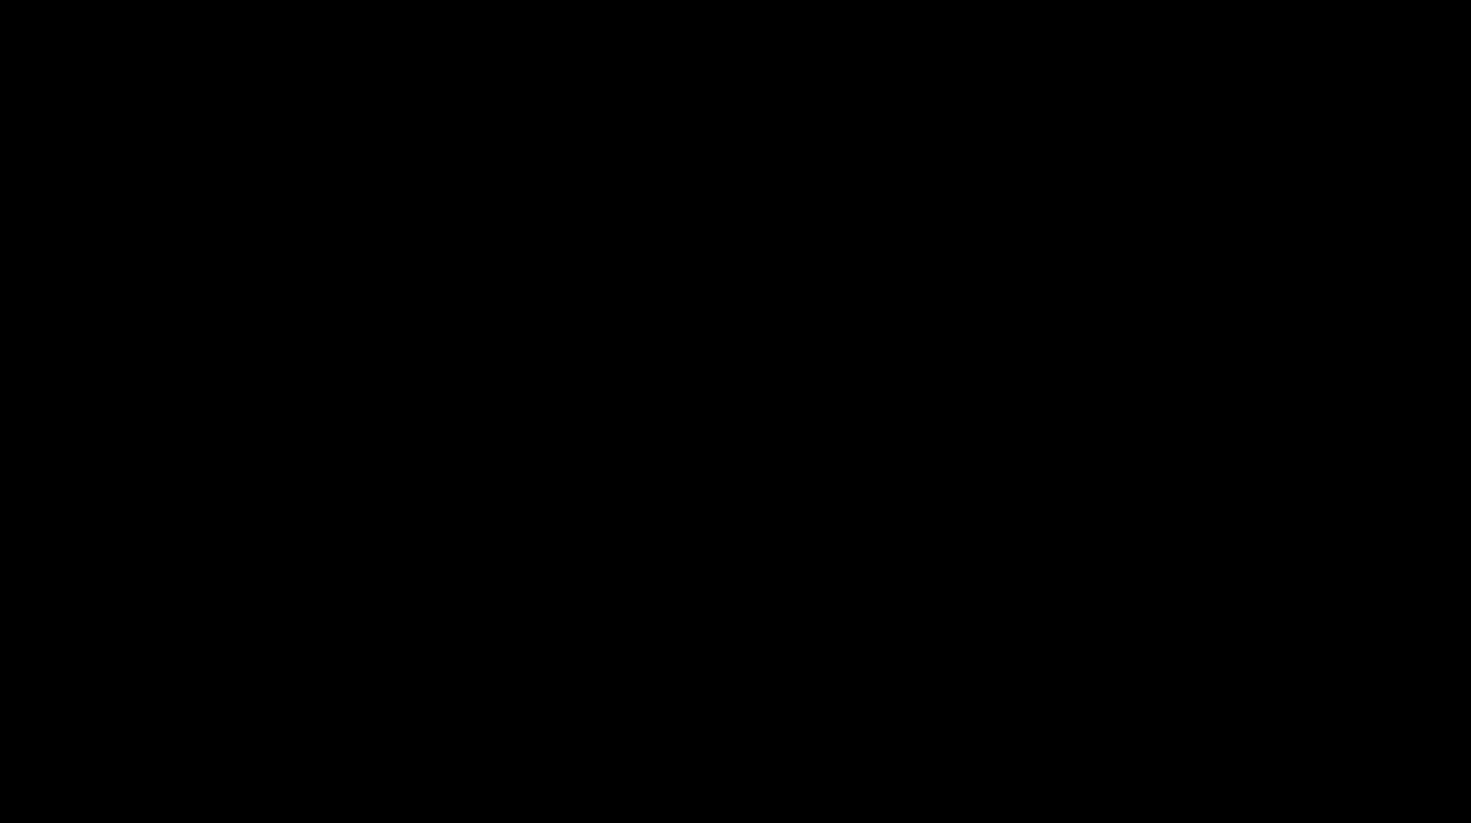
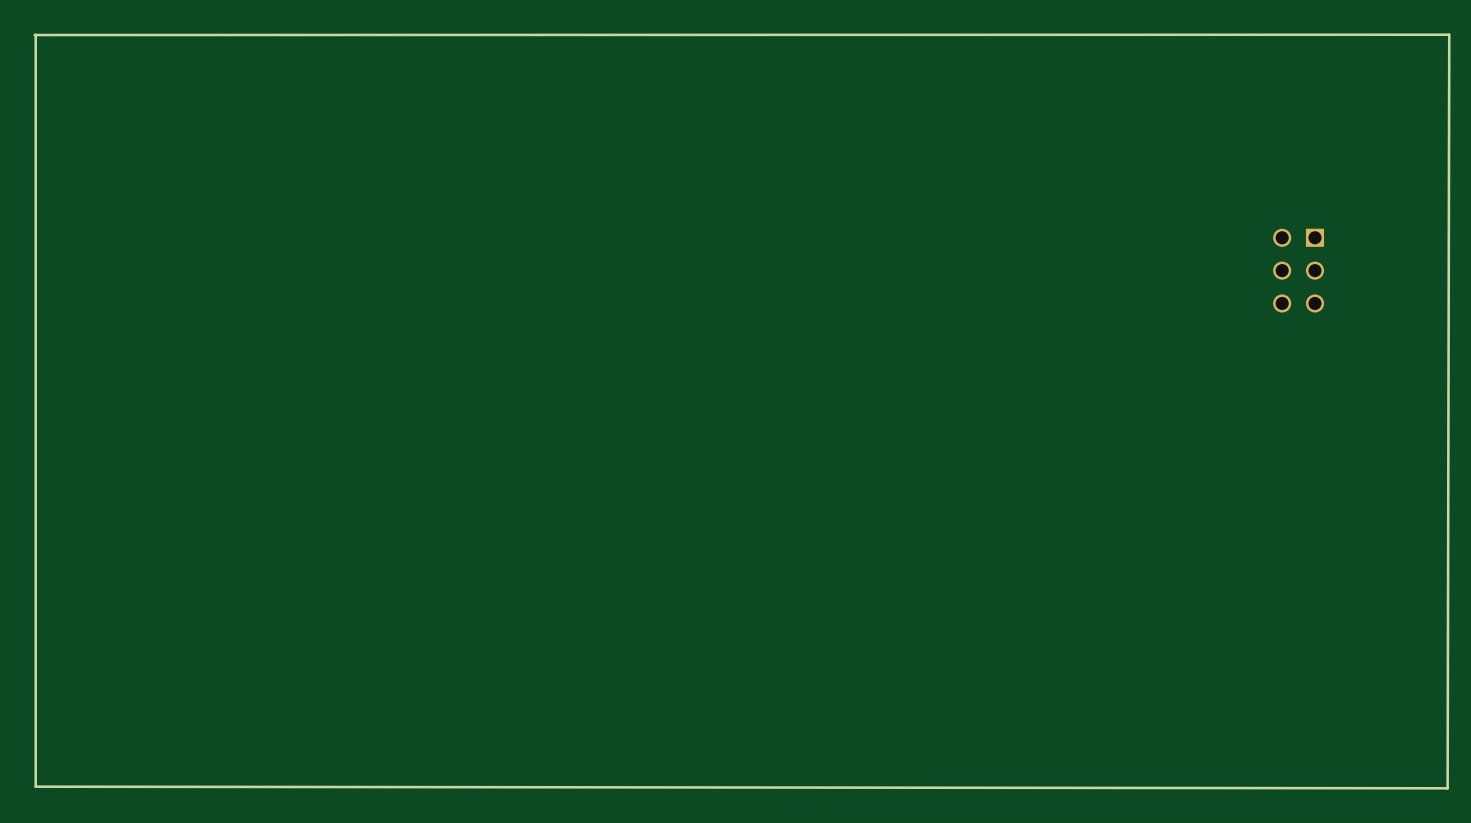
board edge: none -> (1448, 34) (34, 35)
board edge: none -> (1449, 34) (1447, 788) (35, 786) (35, 34)
part: none -> (1298, 270)

